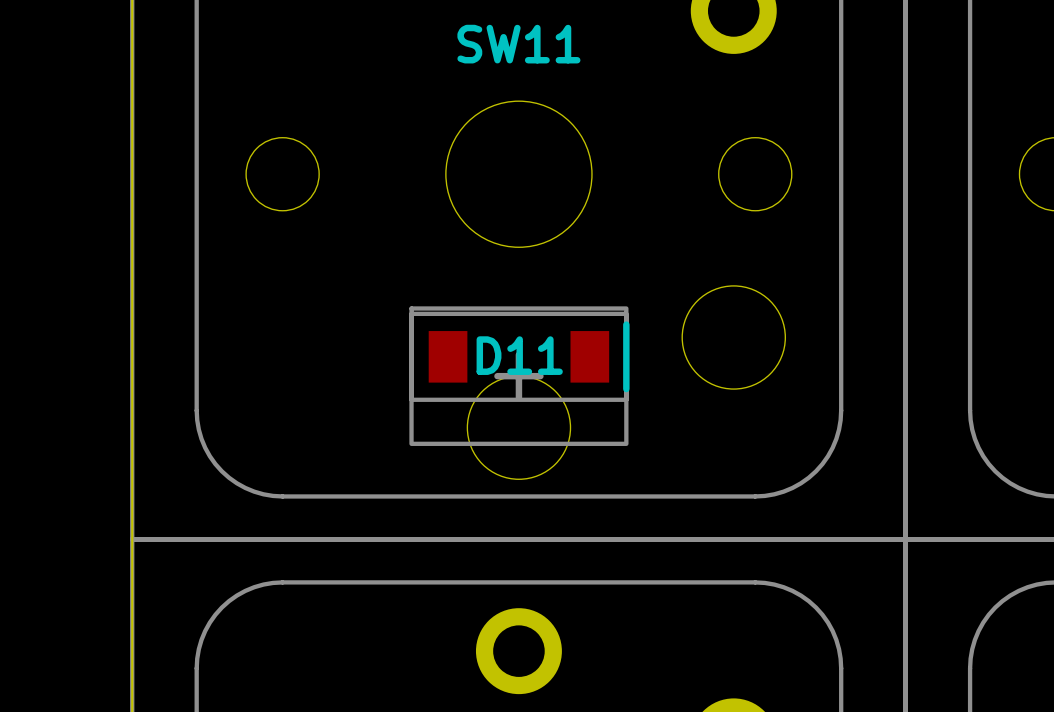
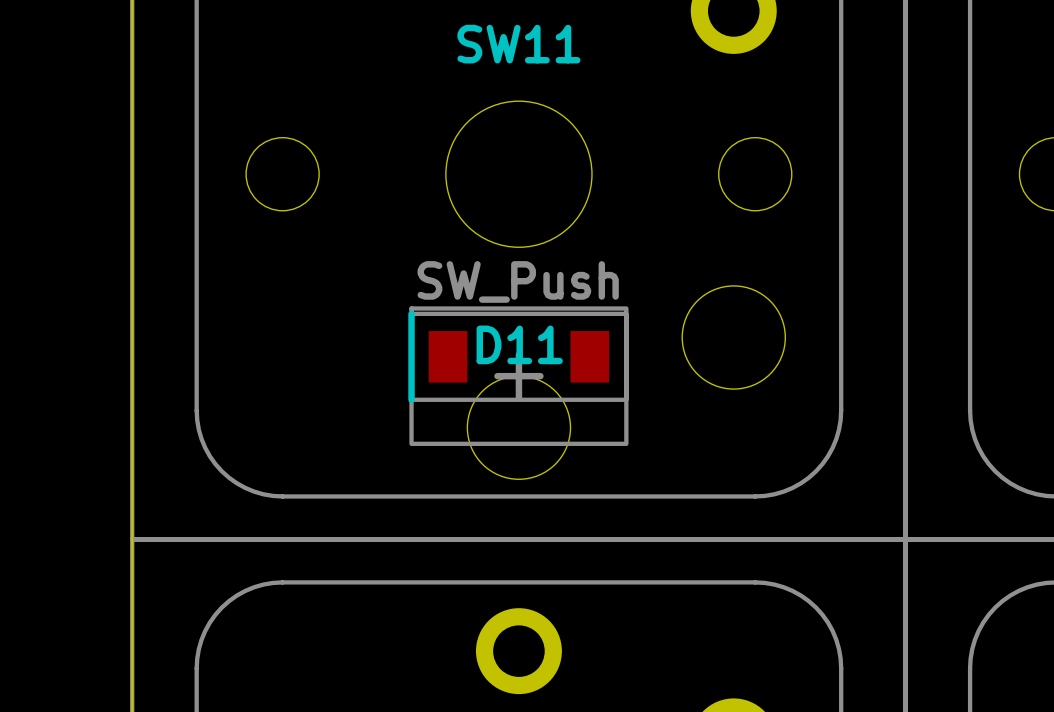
SW11 value: none -> SW_Push (518, 281)
D11 footprint: [409, 311, 630, 402] -> [408, 310, 629, 404]

